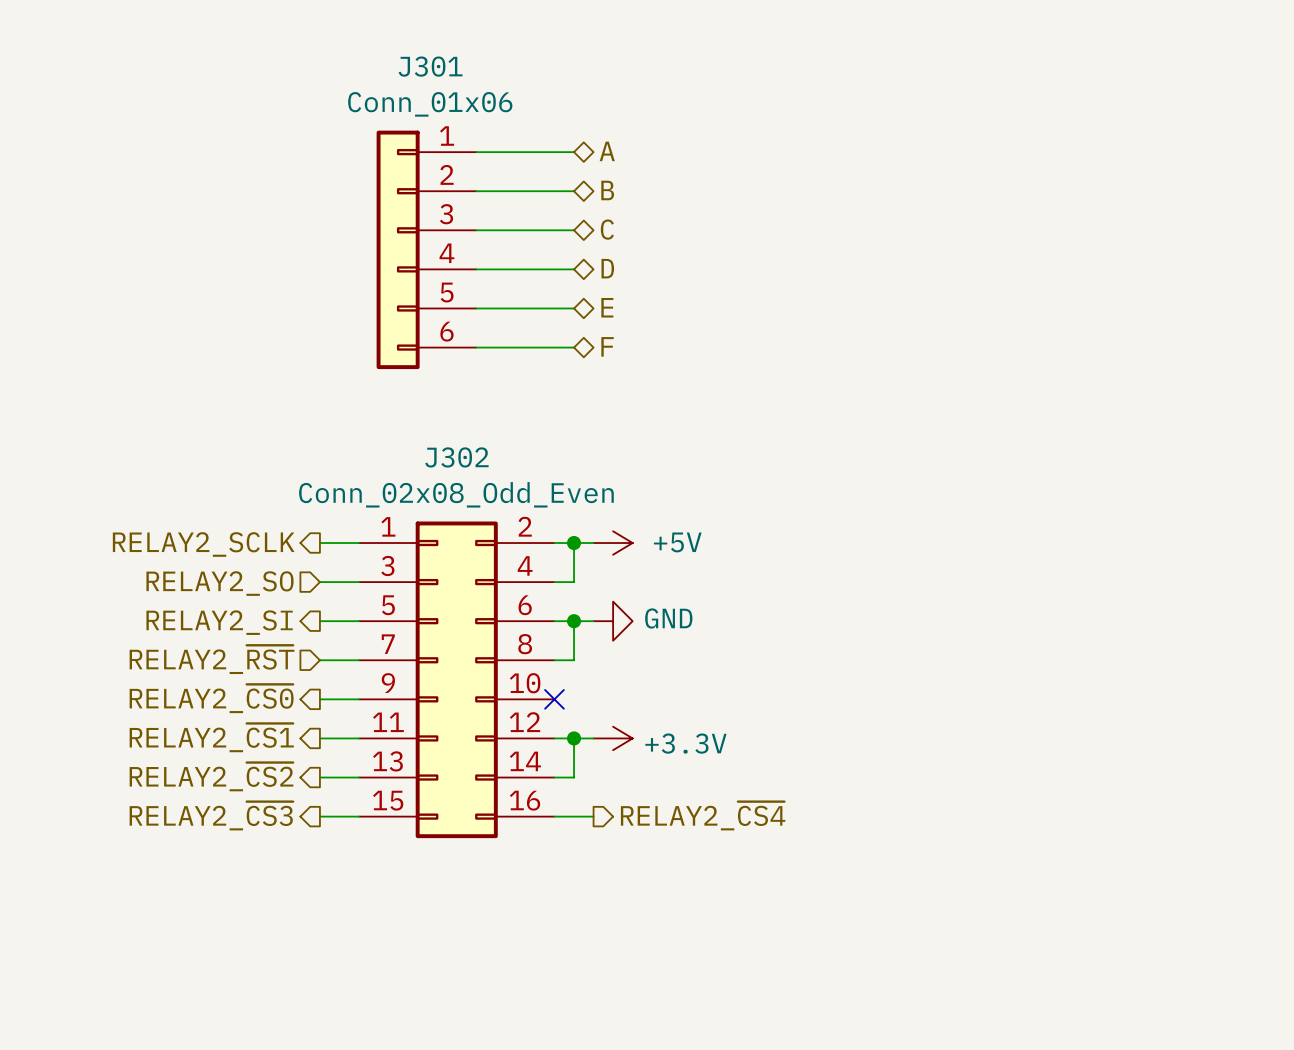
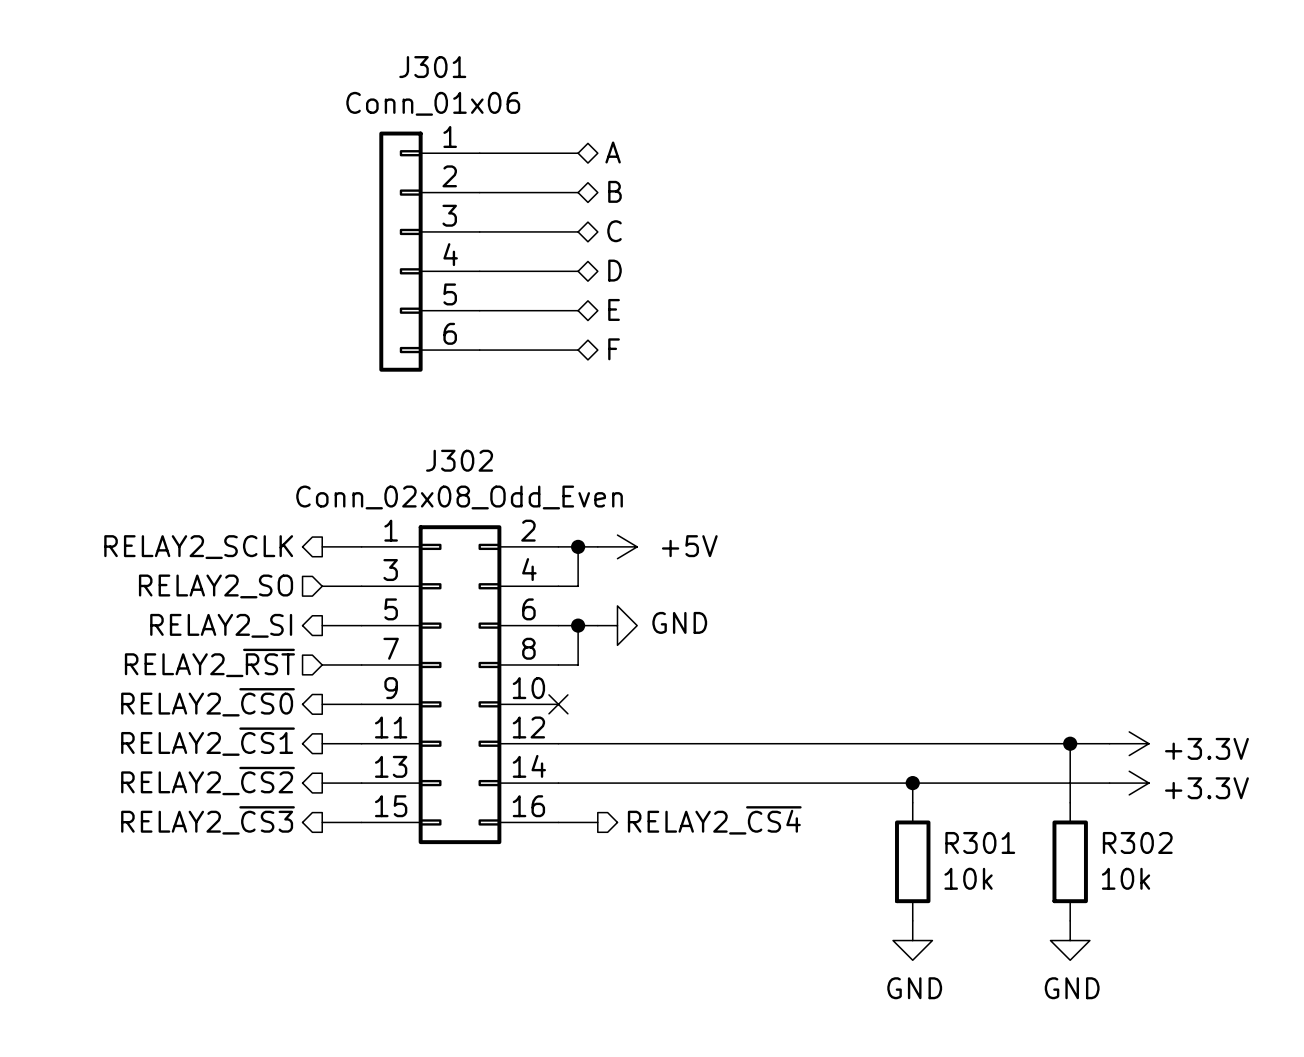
wire: (574, 738) (574, 777) -> (1109, 783) (578, 783)
junction: (574, 738) -> none
wire: none -> (597, 743) (1109, 743)
power symbol: +3.3V (613, 738) -> none
wire: none -> (1070, 743) (1070, 802)
junction: none -> (1070, 743)
power symbol: none -> +3.3V (1129, 743)
wire: none -> (912, 783) (912, 802)
junction: none -> (912, 783)
power symbol: none -> +3.3V (1129, 783)
R301: none -> 10k (912, 861)
R302: none -> 10k (1070, 861)
power symbol: none -> GND (912, 940)
power symbol: none -> GND (1070, 940)

